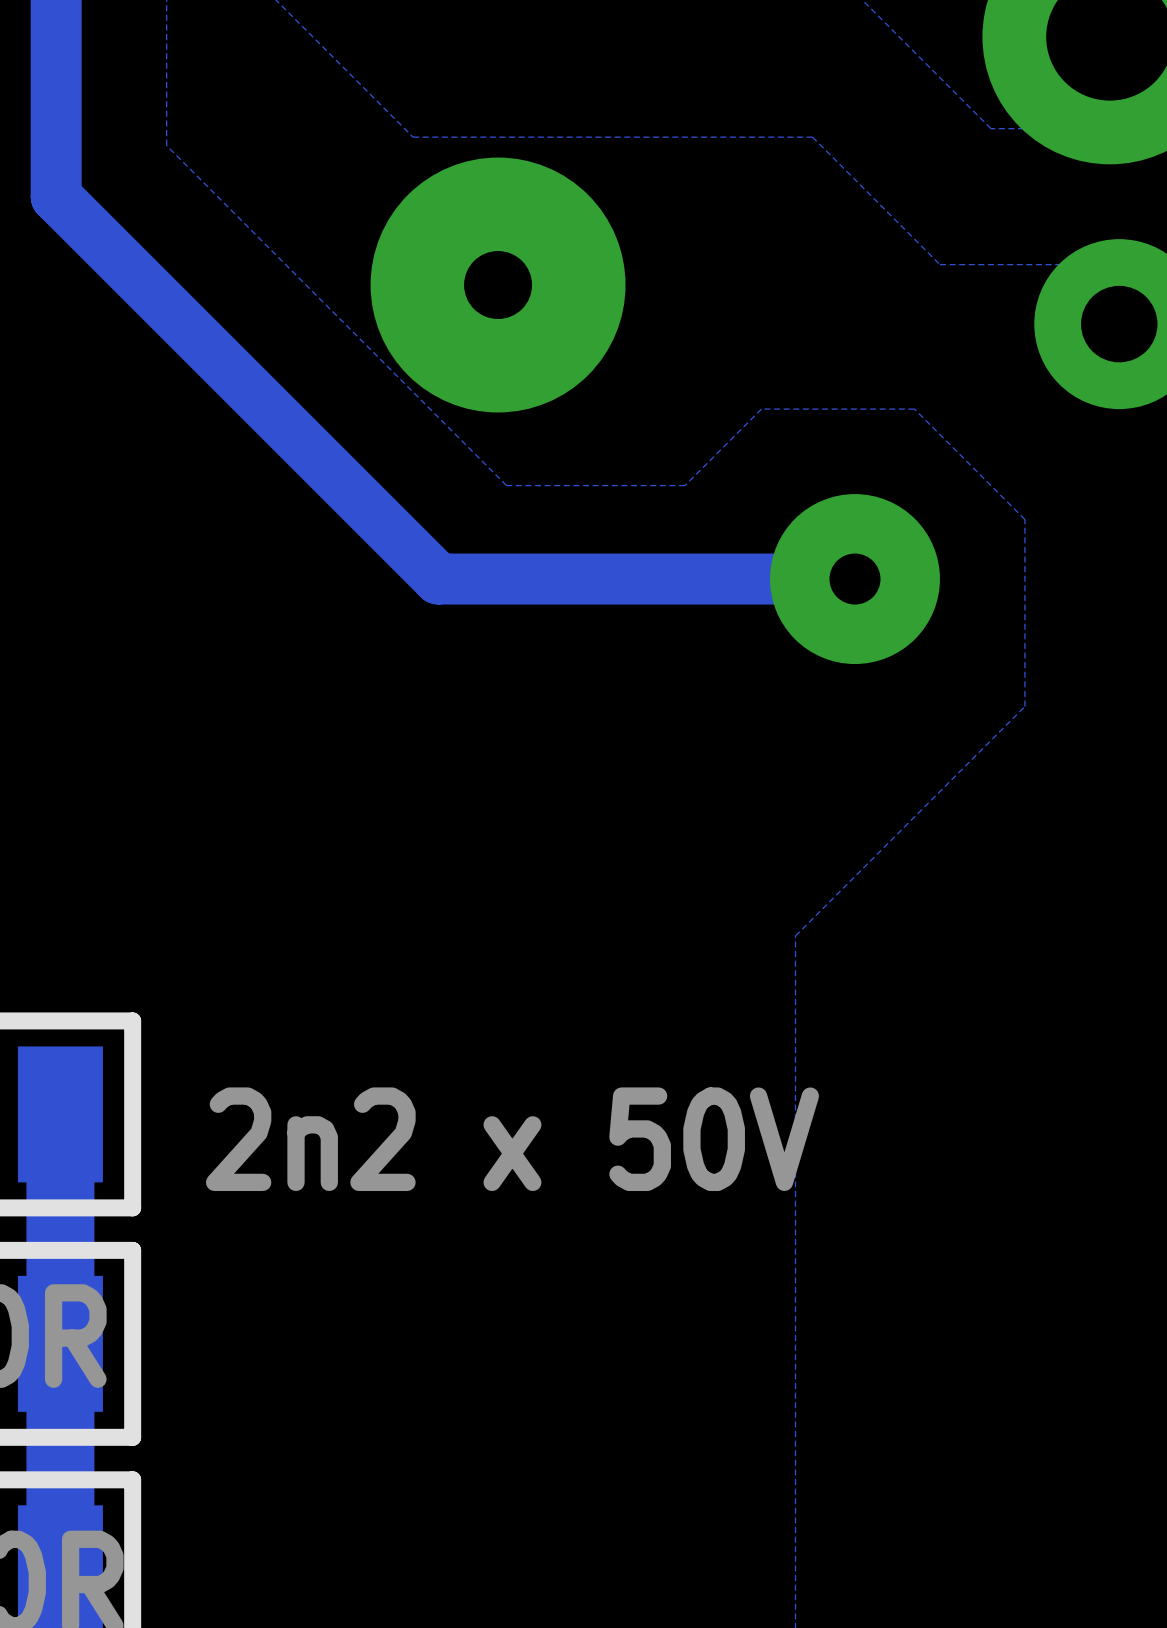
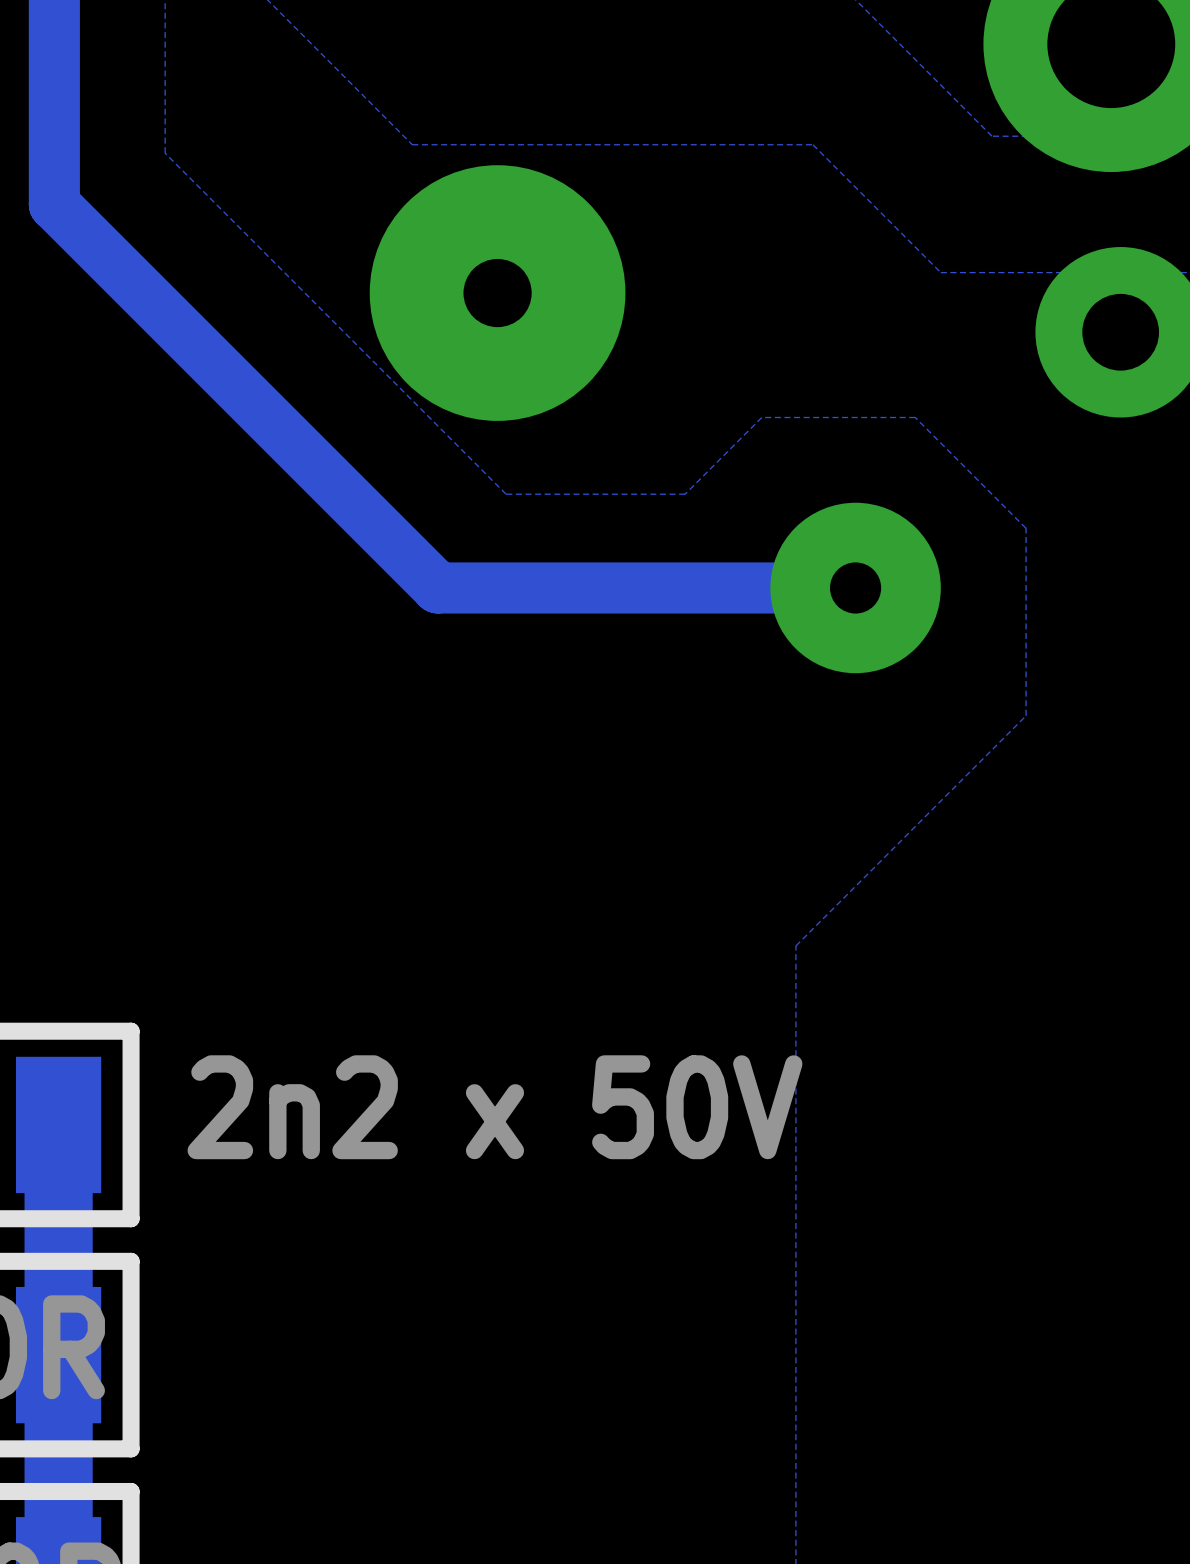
part value position: 2n2 x 50V (512, 1139) -> 2n2 x 50V (494, 1107)

